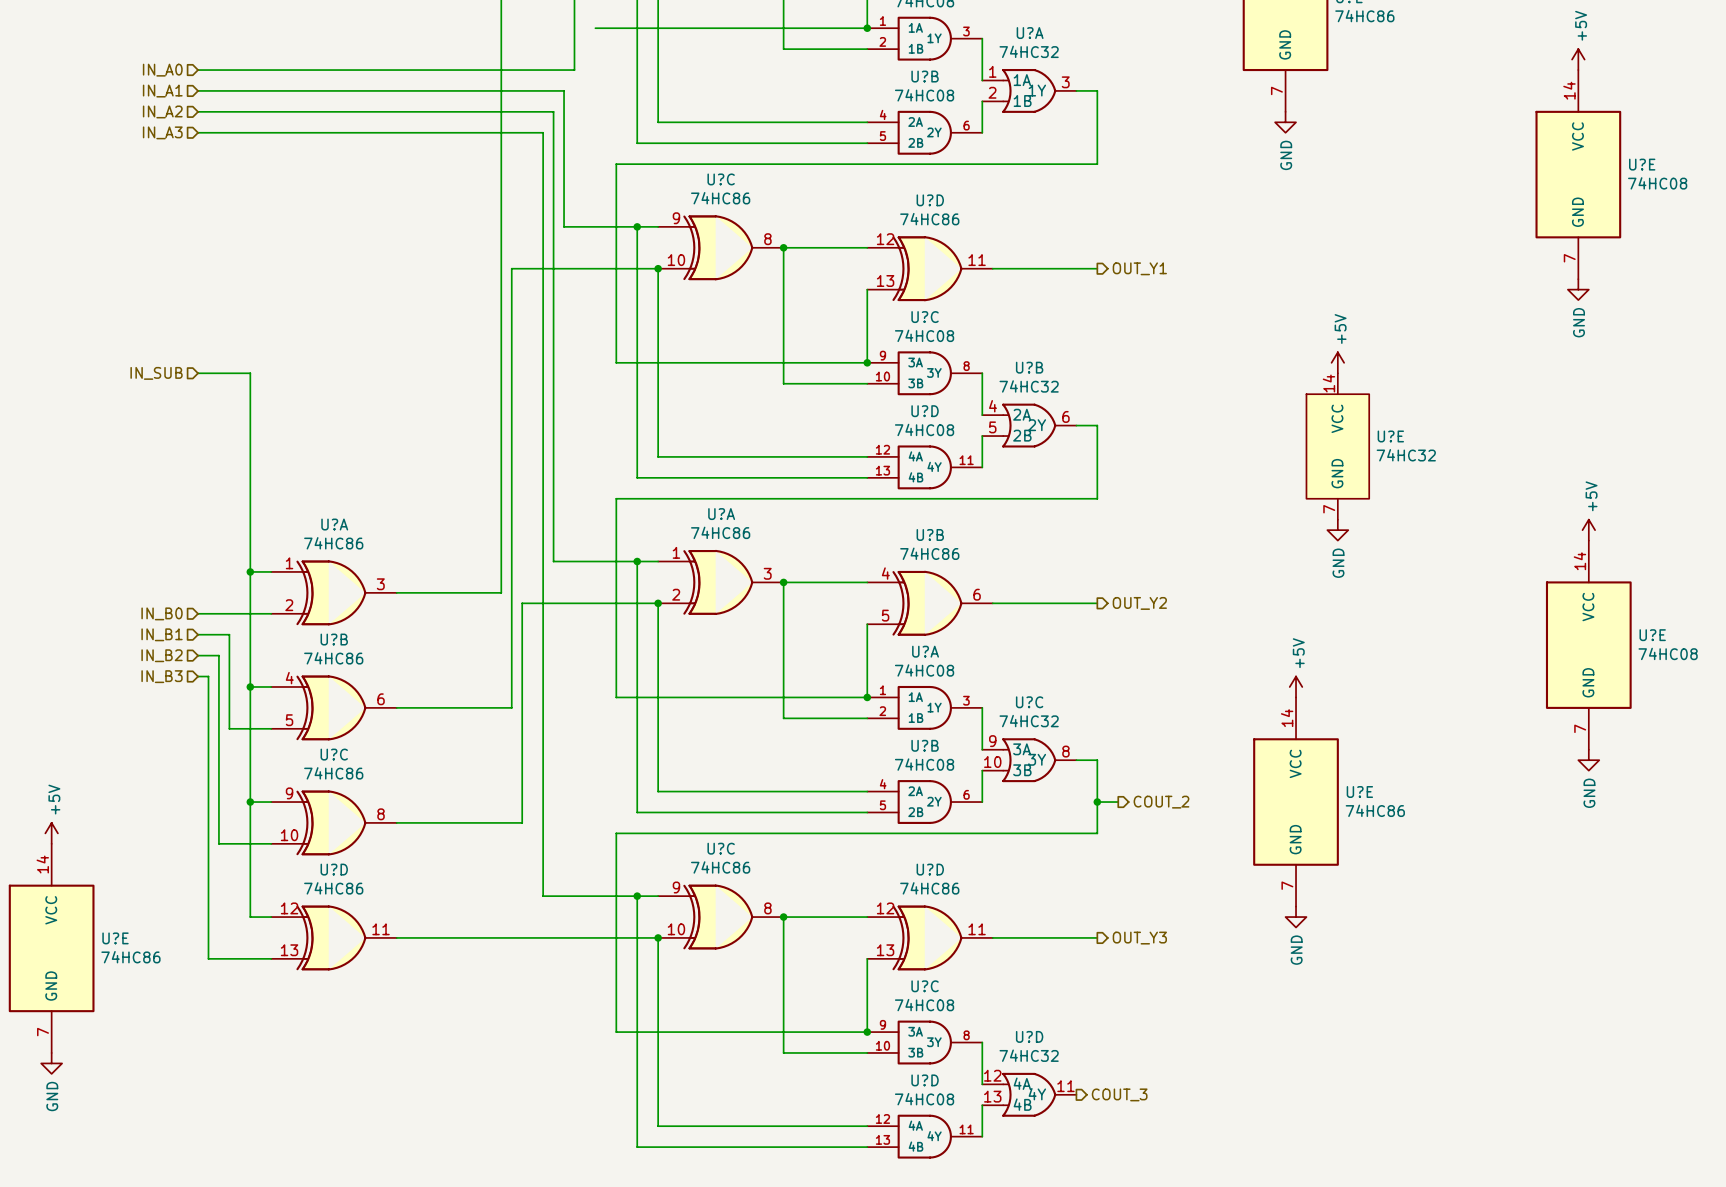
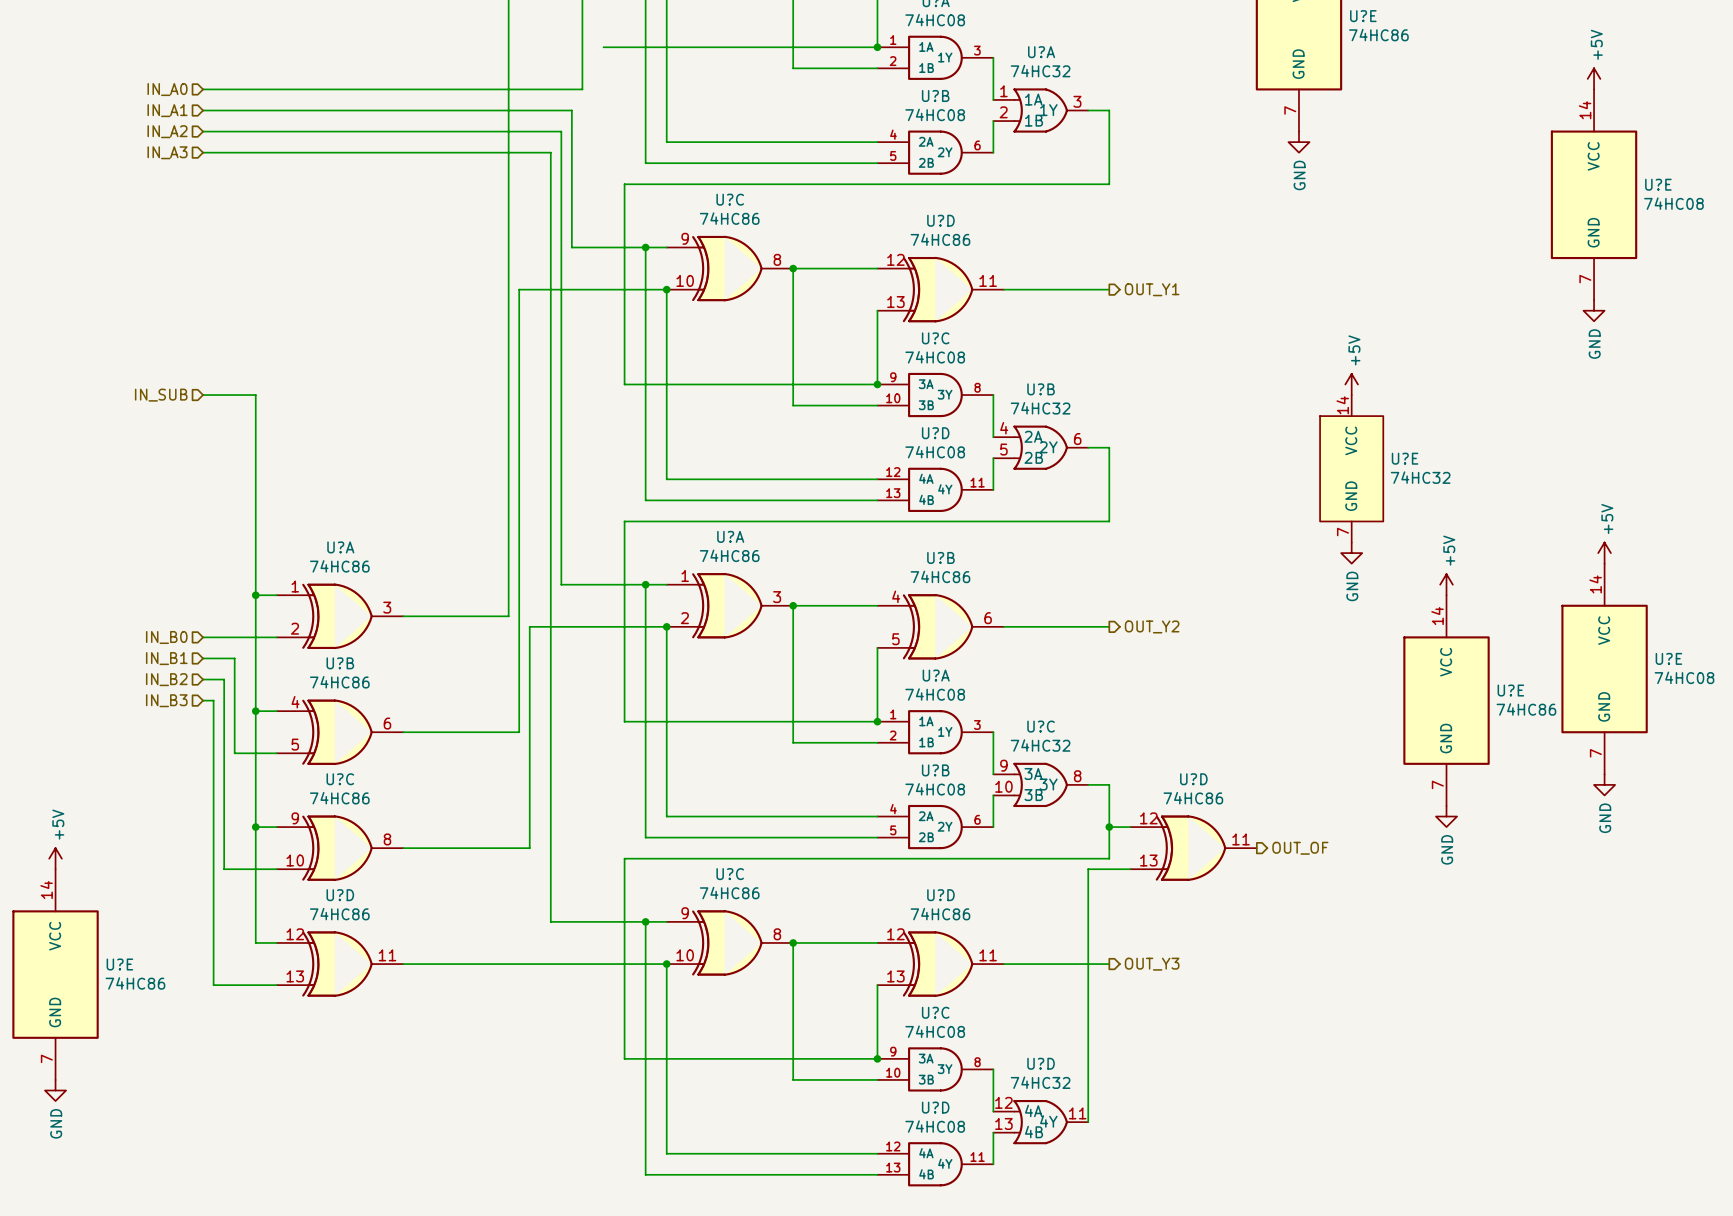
power symbol position: +5V (1296, 686) -> +5V (1446, 584)
hierarchical label: COUT_2 (1161, 802) -> none
U?E position: (1296, 802) -> (1446, 700)
U?D: none -> 74HC86 (1193, 848)
hierarchical label: none -> OUT_OF (1300, 848)
wire: none -> (1130, 869) (1088, 869) (1088, 1122)
power symbol position: GND (1296, 917) -> GND (1446, 816)
hierarchical label: COUT_3 (1119, 1094) -> none

